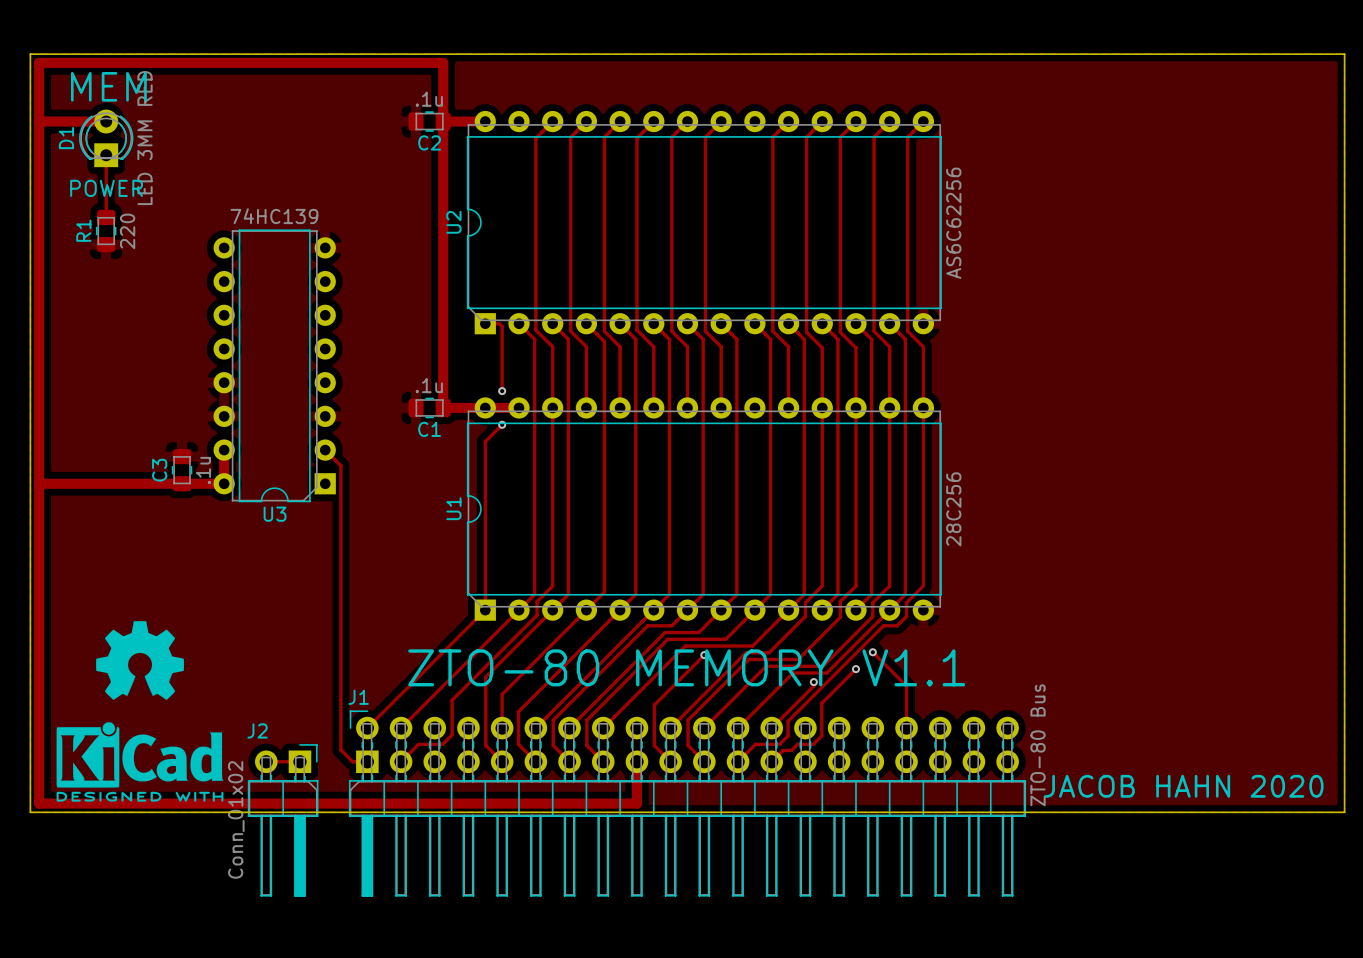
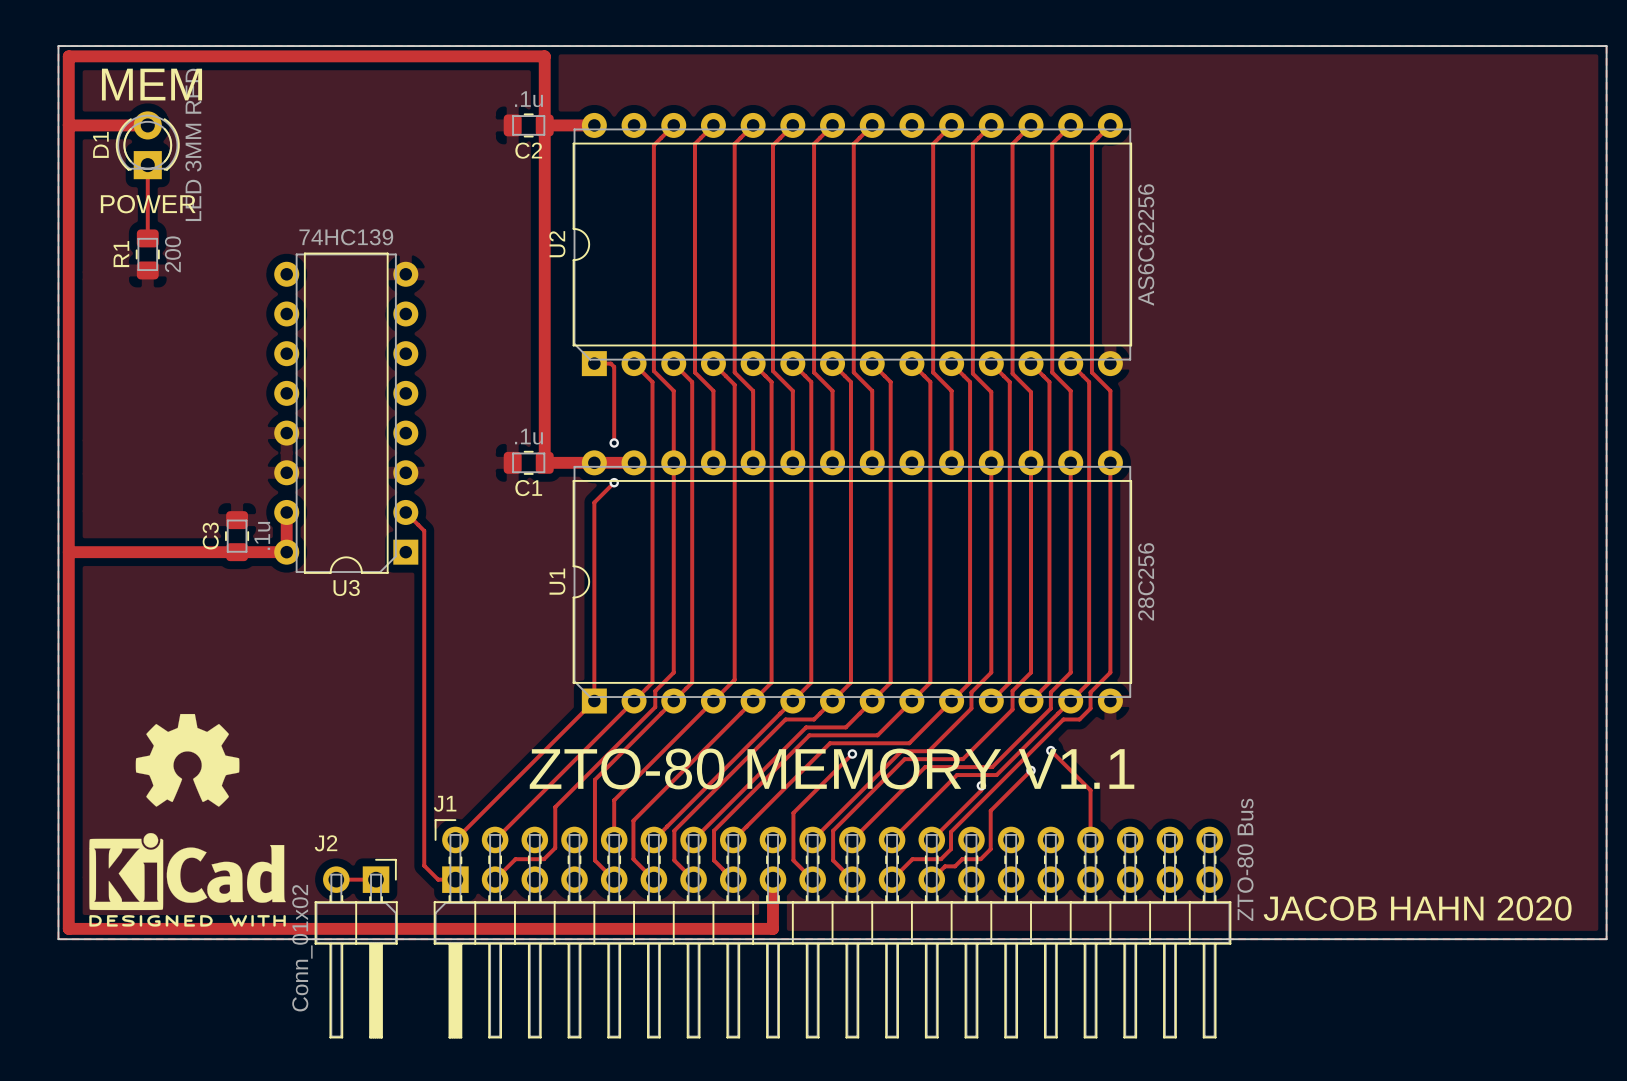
R1 value: 220 (127, 231) -> 200 (172, 254)

